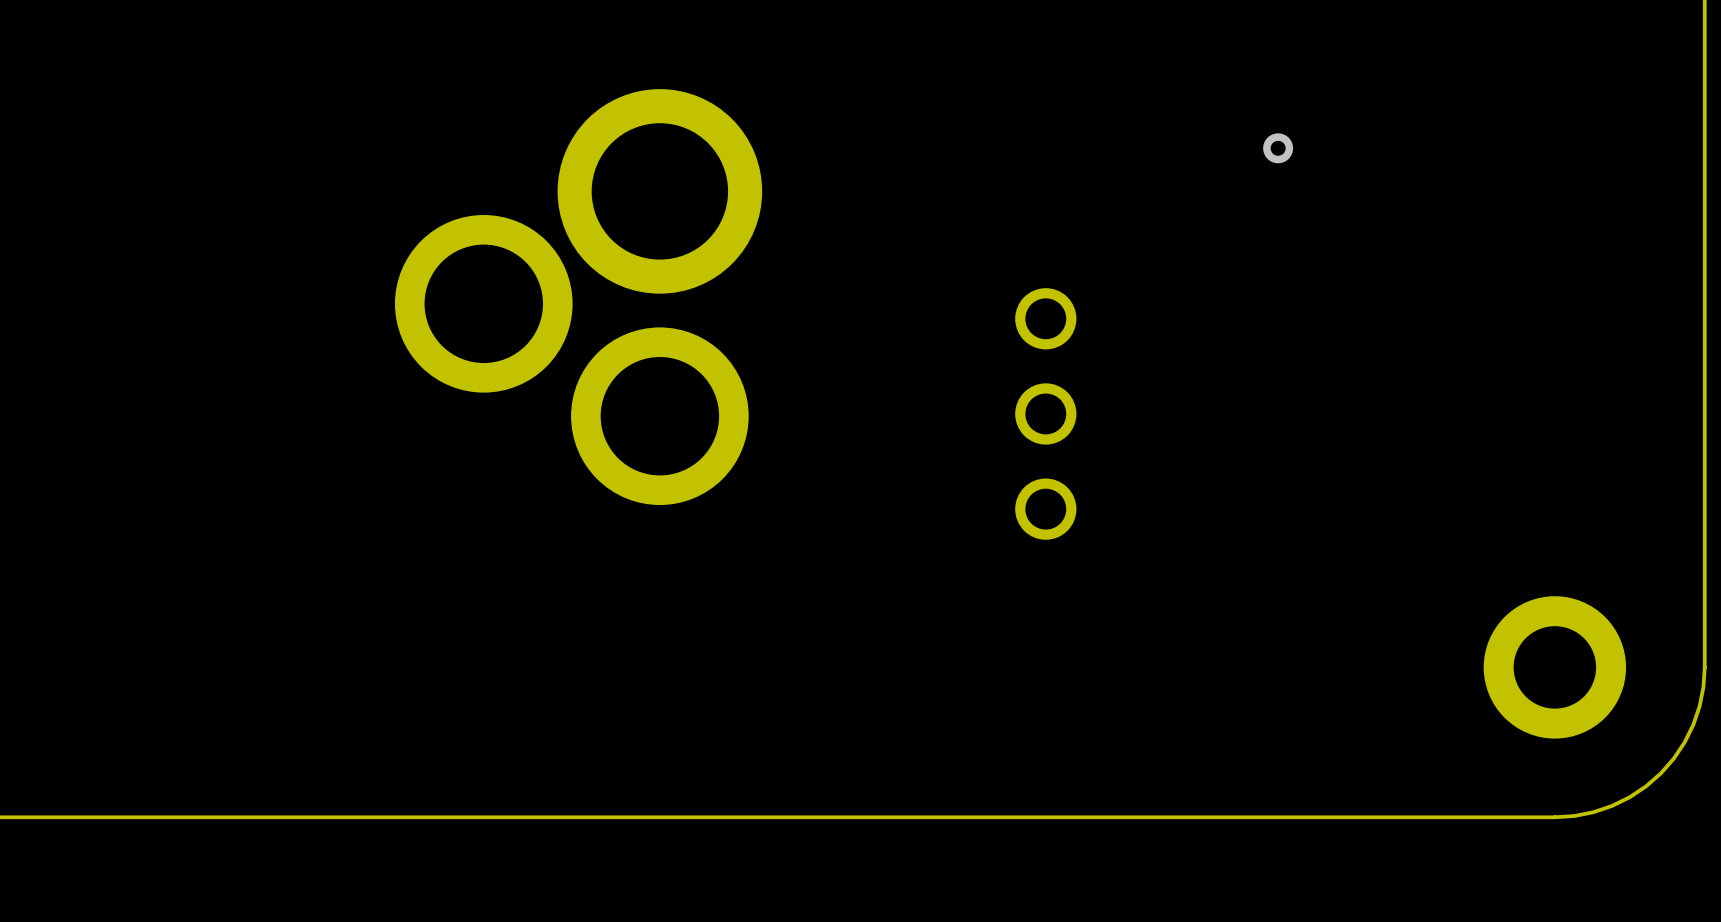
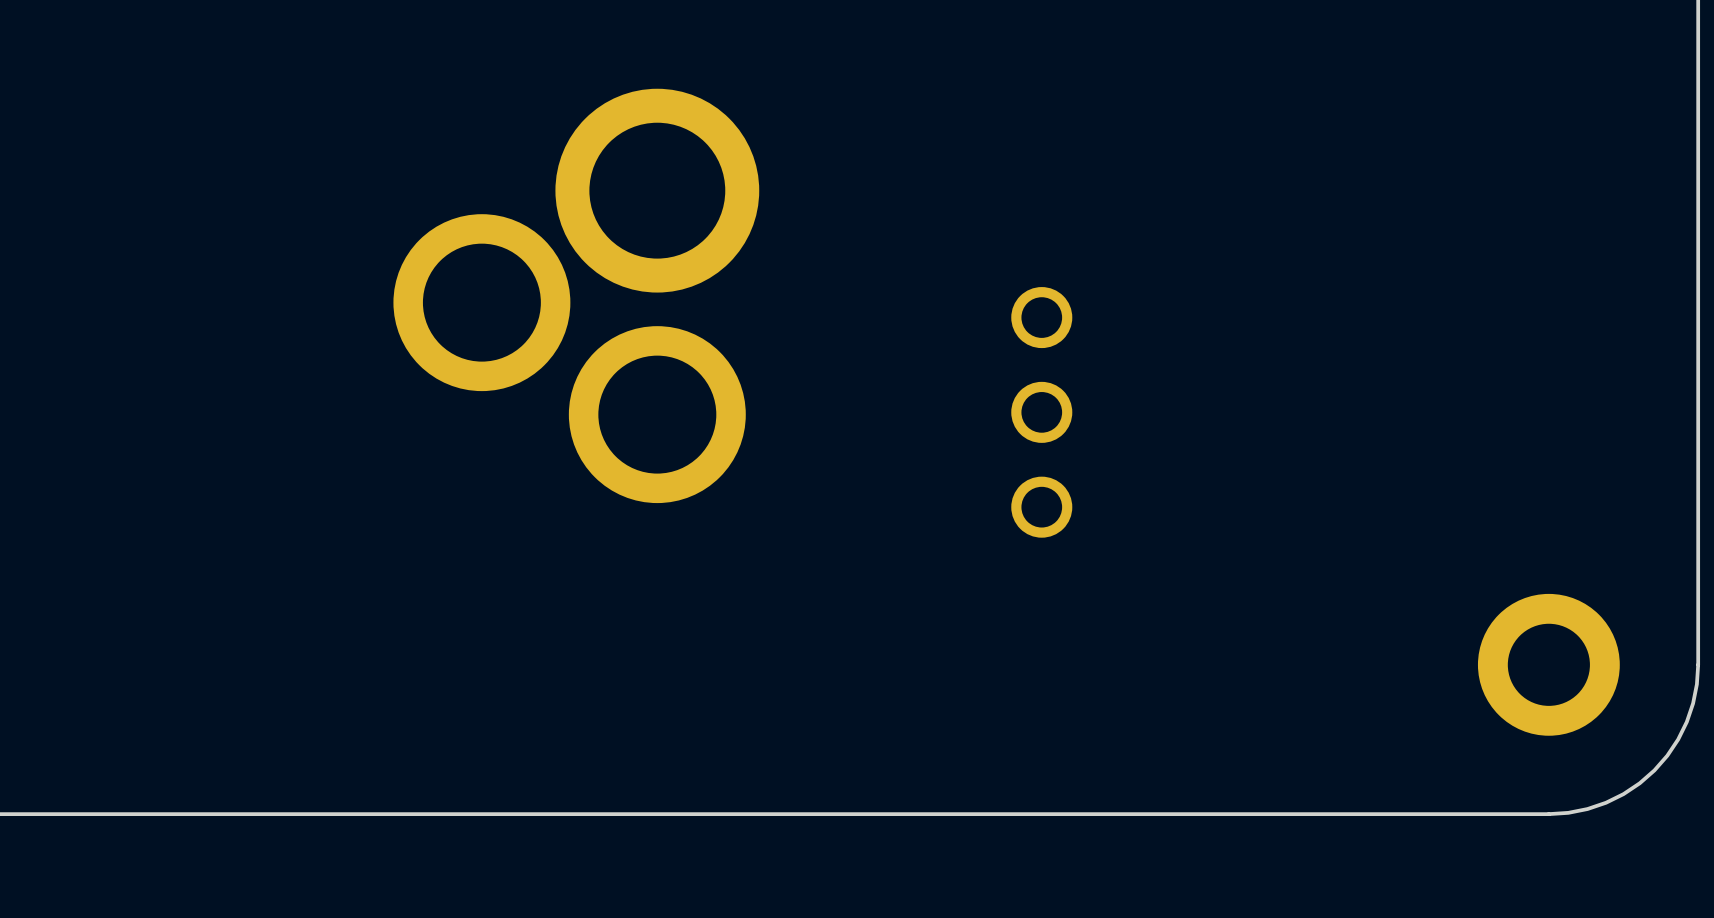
via: (1278, 148) -> none

